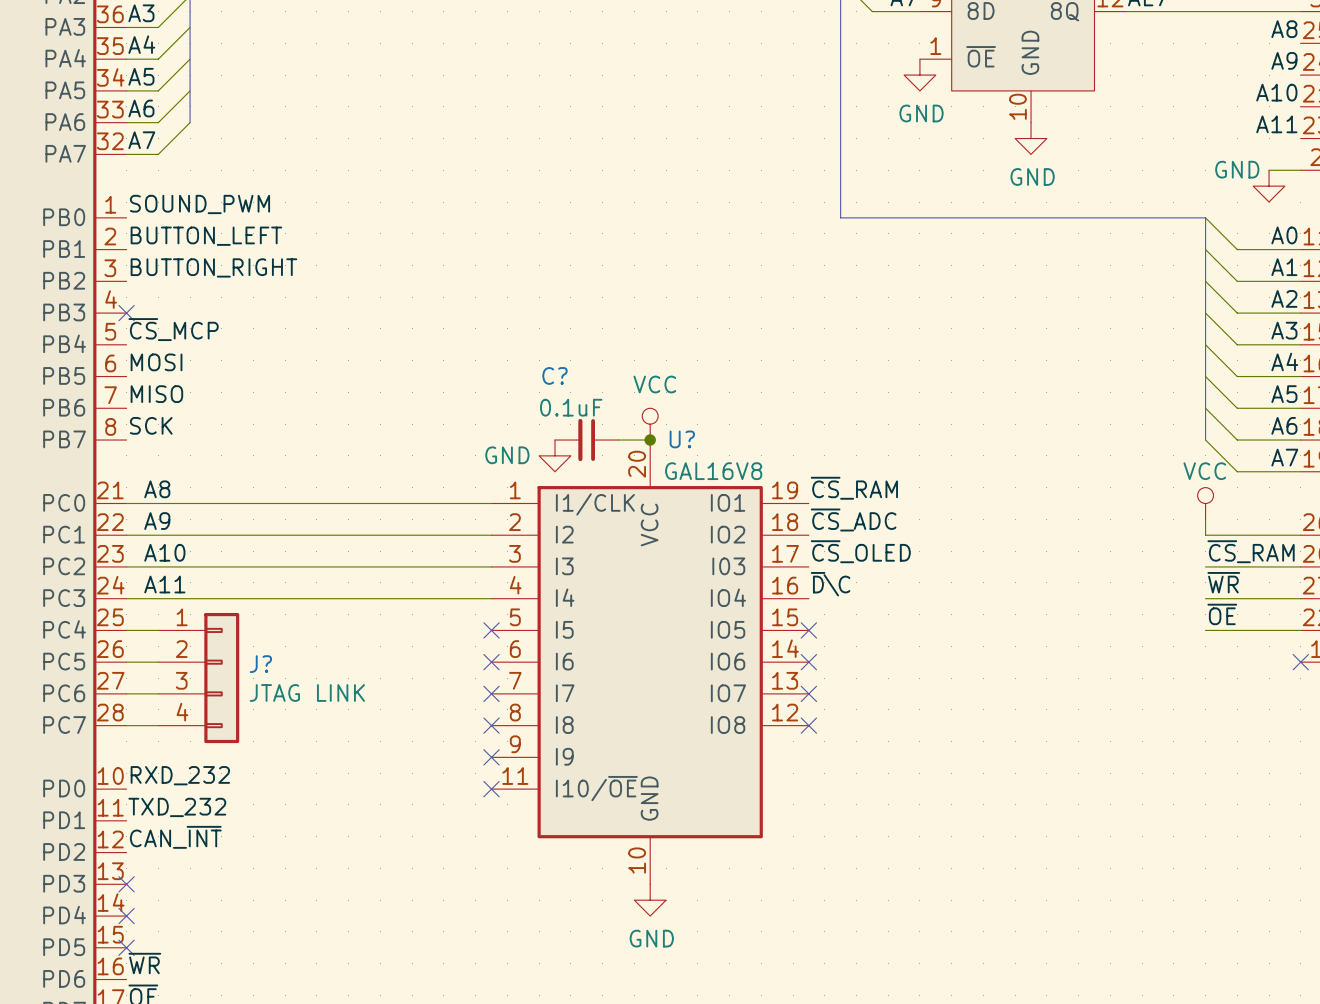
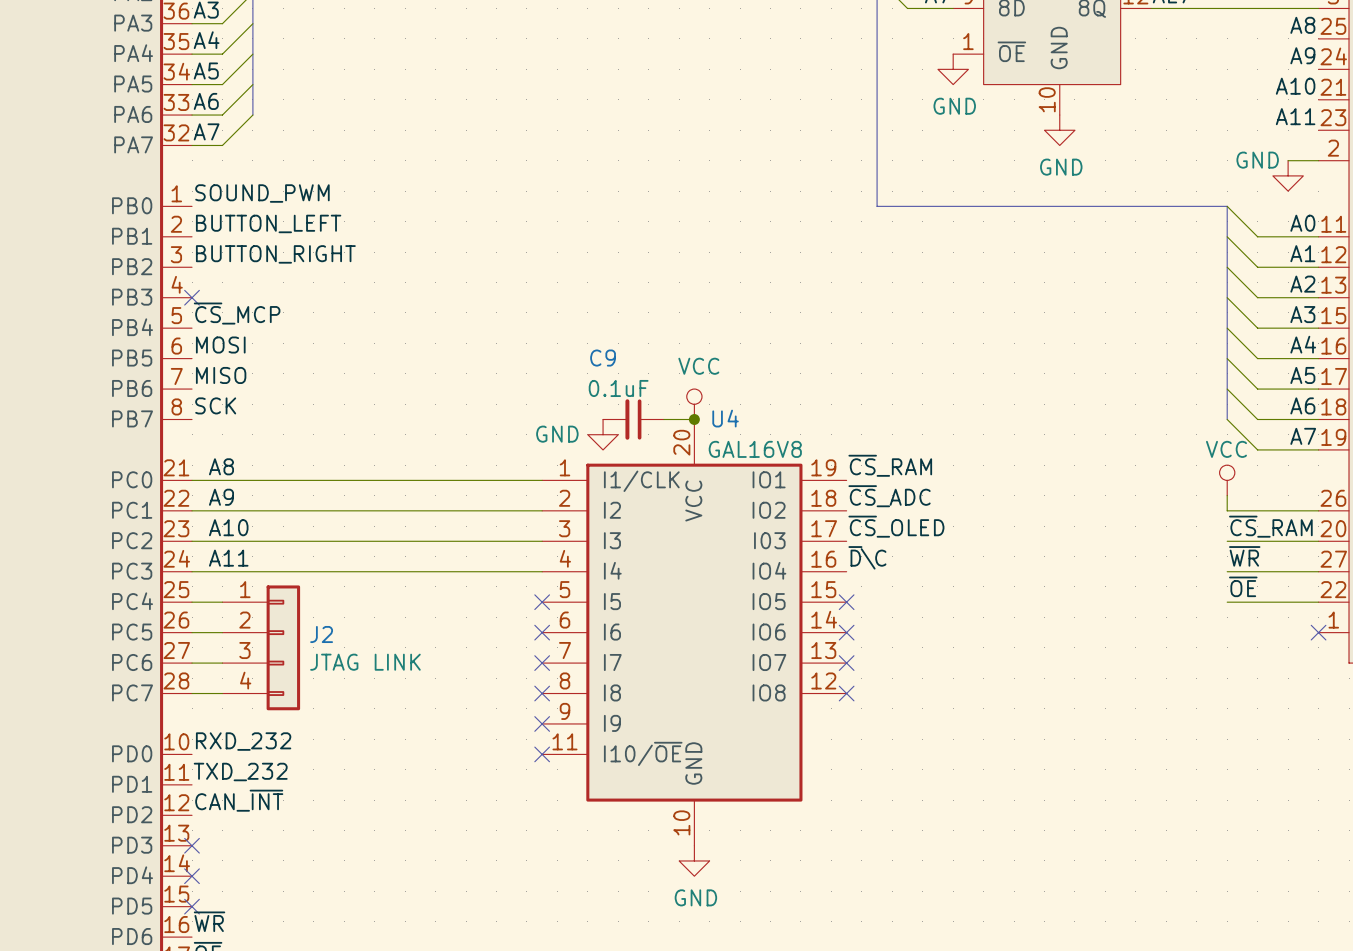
C? name: C? (554, 375) -> C9 (603, 358)
U? name: U? (682, 439) -> U4 (725, 418)
J? name: J? (260, 664) -> J2 (321, 634)

